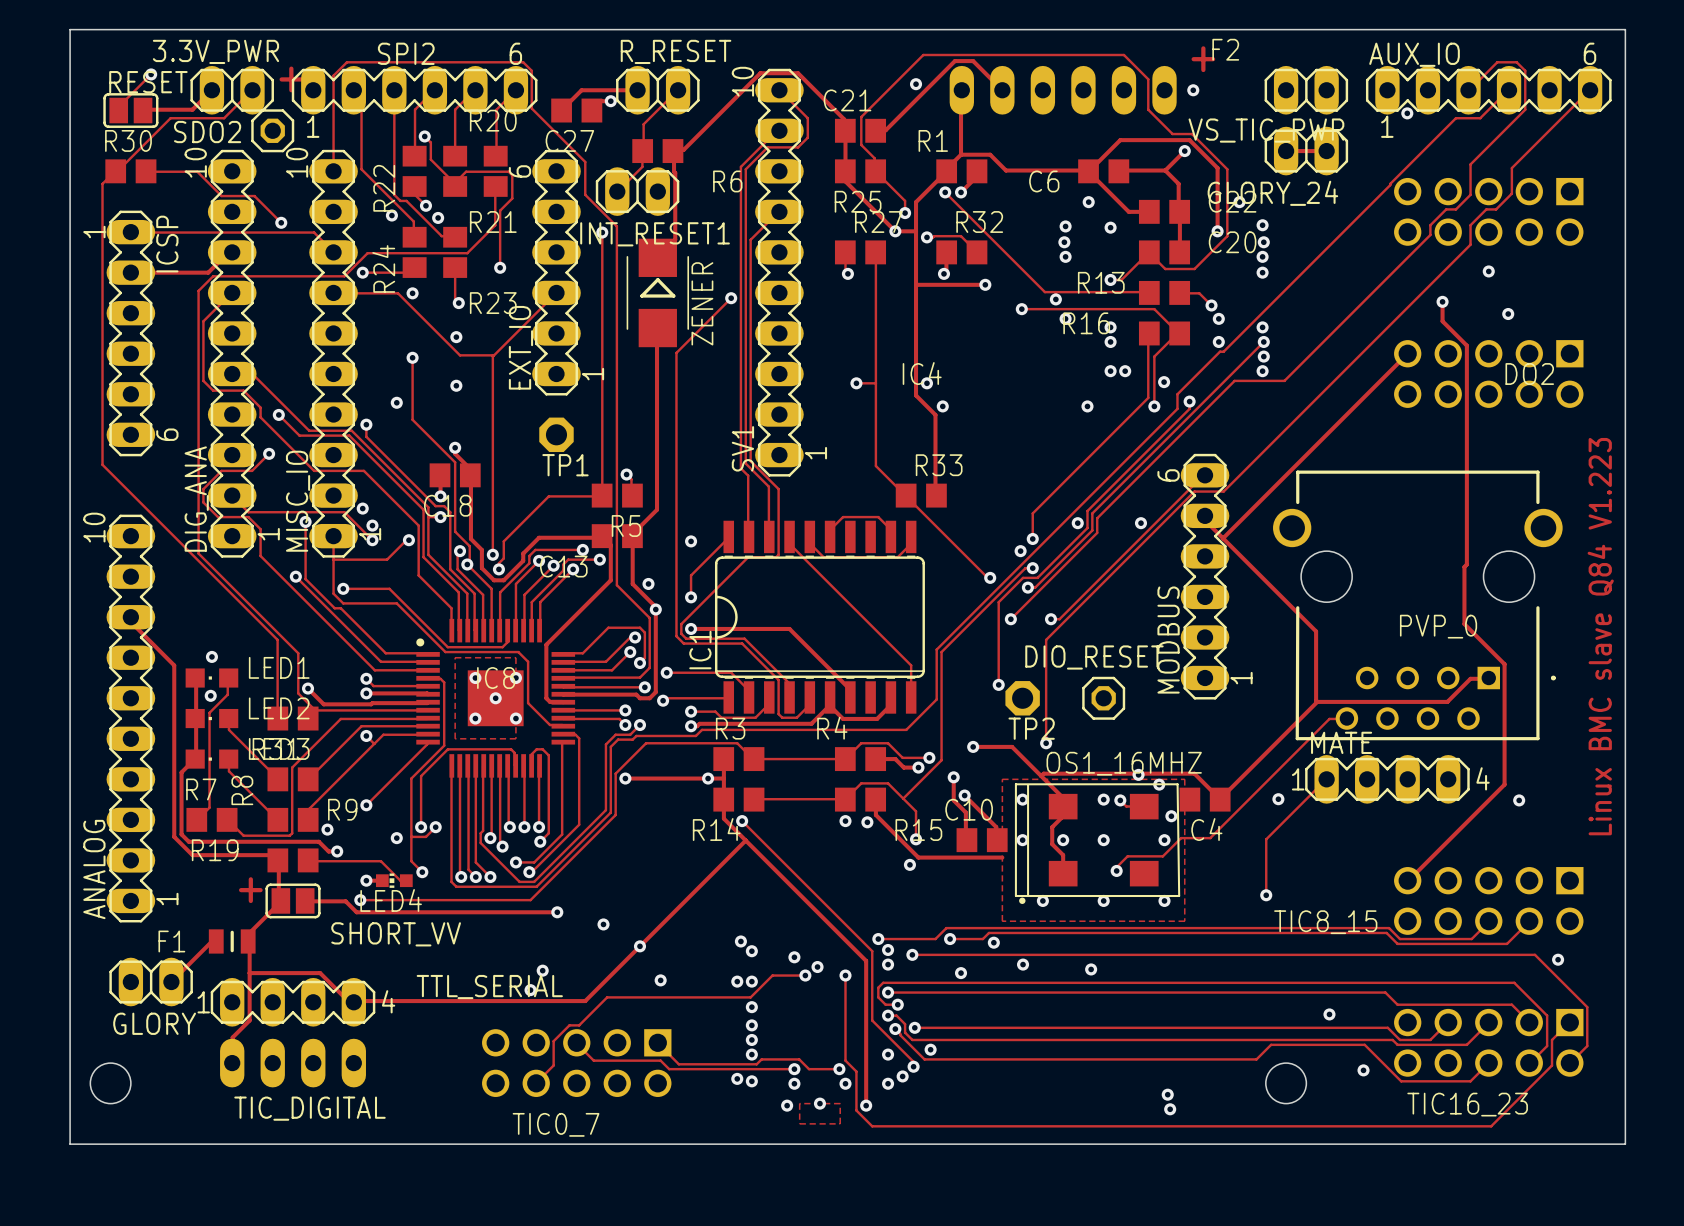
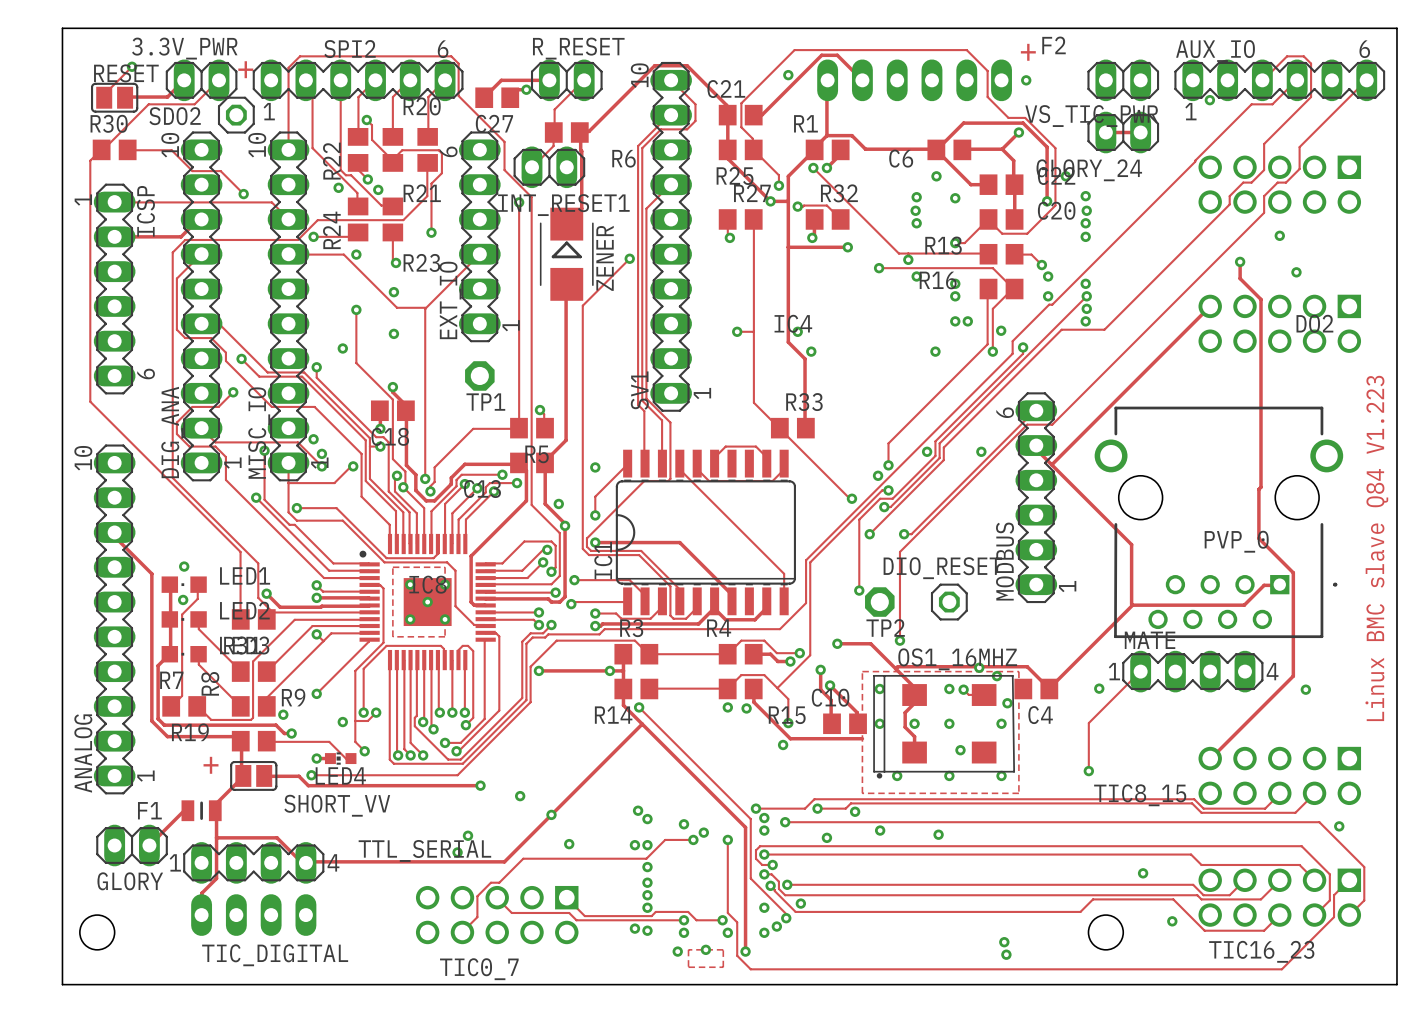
track: (1346, 718) (1329, 718) (1210, 838) (1181, 838) (1162, 856) (1127, 856) (1116, 867) (1116, 870) -> none

